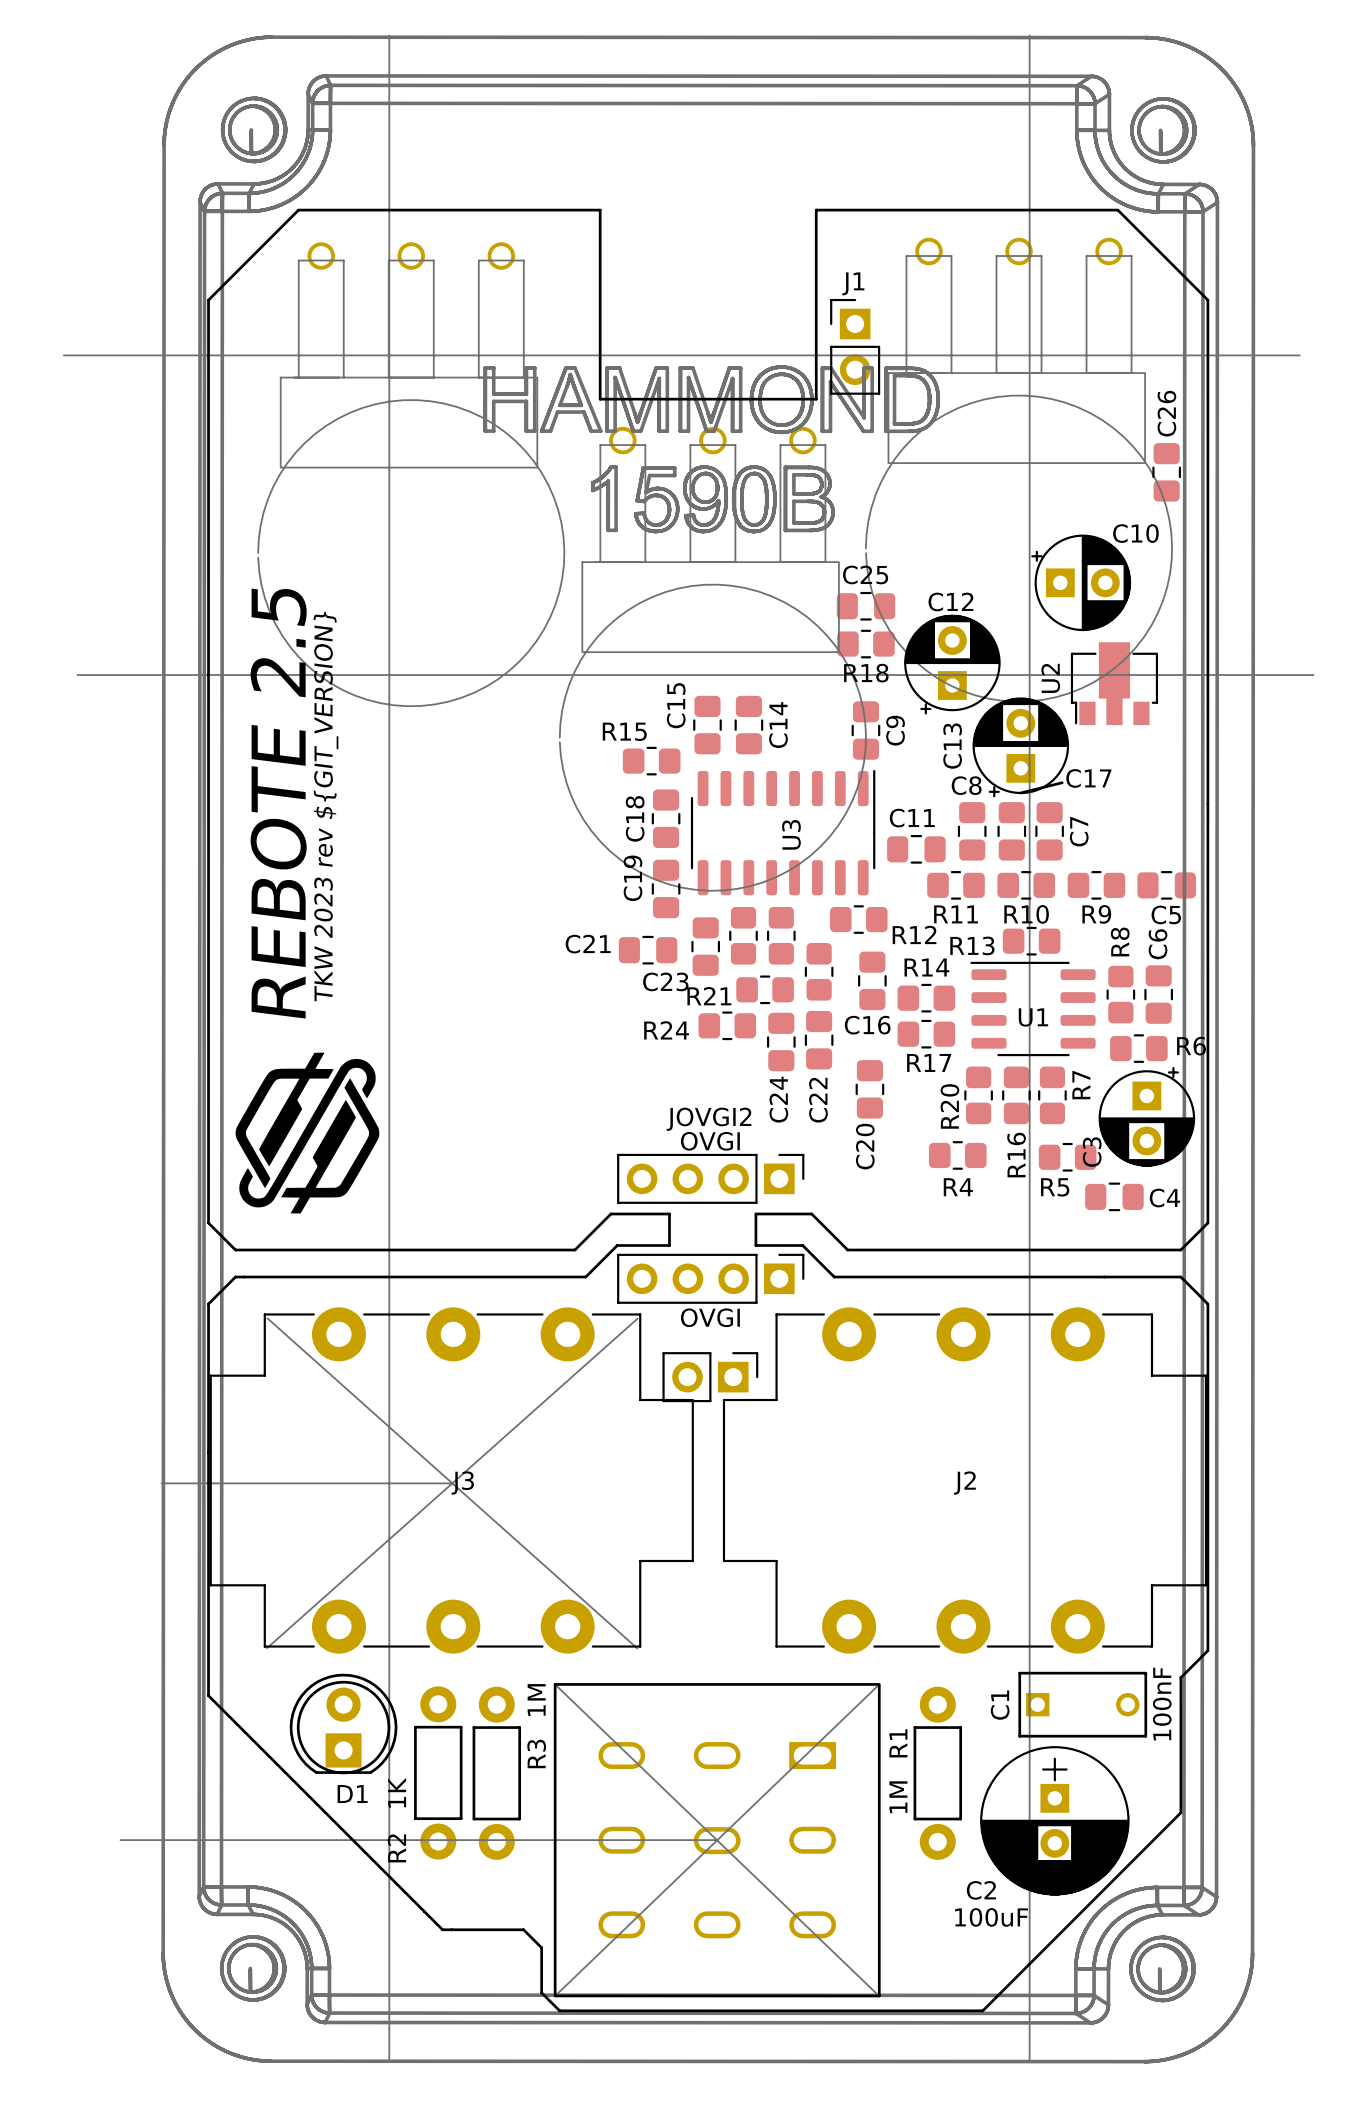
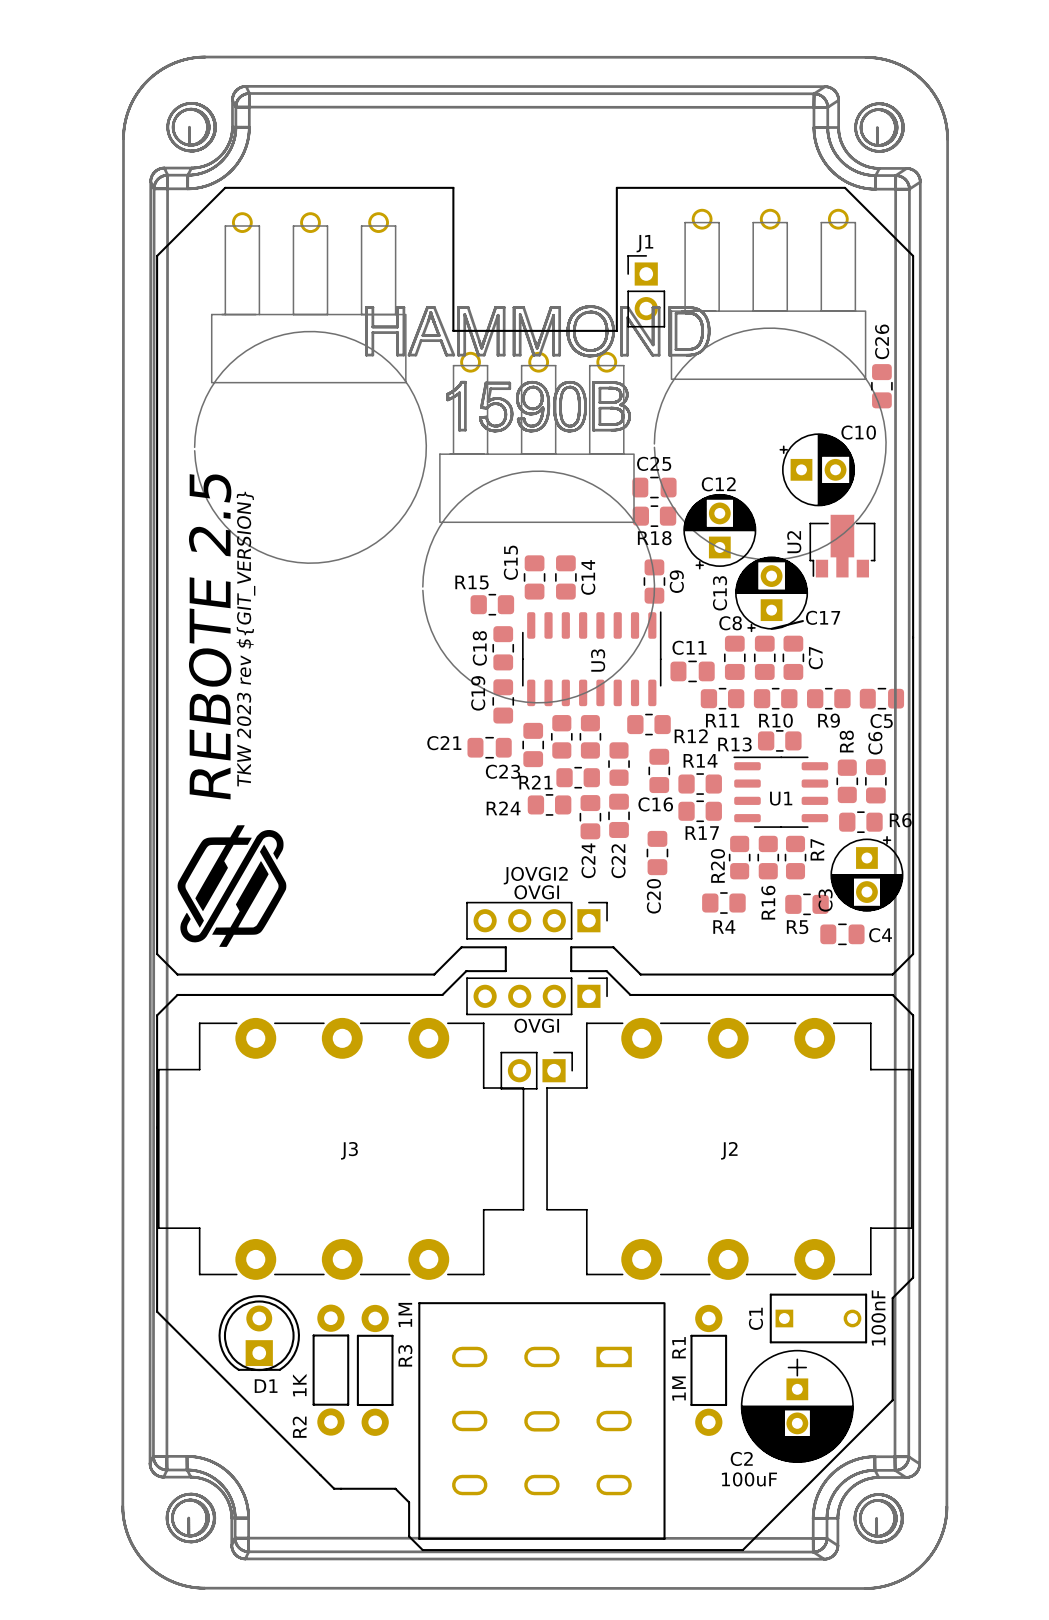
line: (389, 35) (389, 2059) -> none
line: (1029, 35) (1029, 2059) -> none
line: (63, 355) (1299, 355) -> none
line: (77, 675) (1313, 675) -> none
line: (267, 1318) (637, 1648) -> none
line: (637, 1318) (267, 1648) -> none
line: (161, 1483) (452, 1483) -> none
line: (555, 1684) (879, 1996) -> none
line: (879, 1684) (555, 1995) -> none
line: (120, 1840) (717, 1840) -> none

